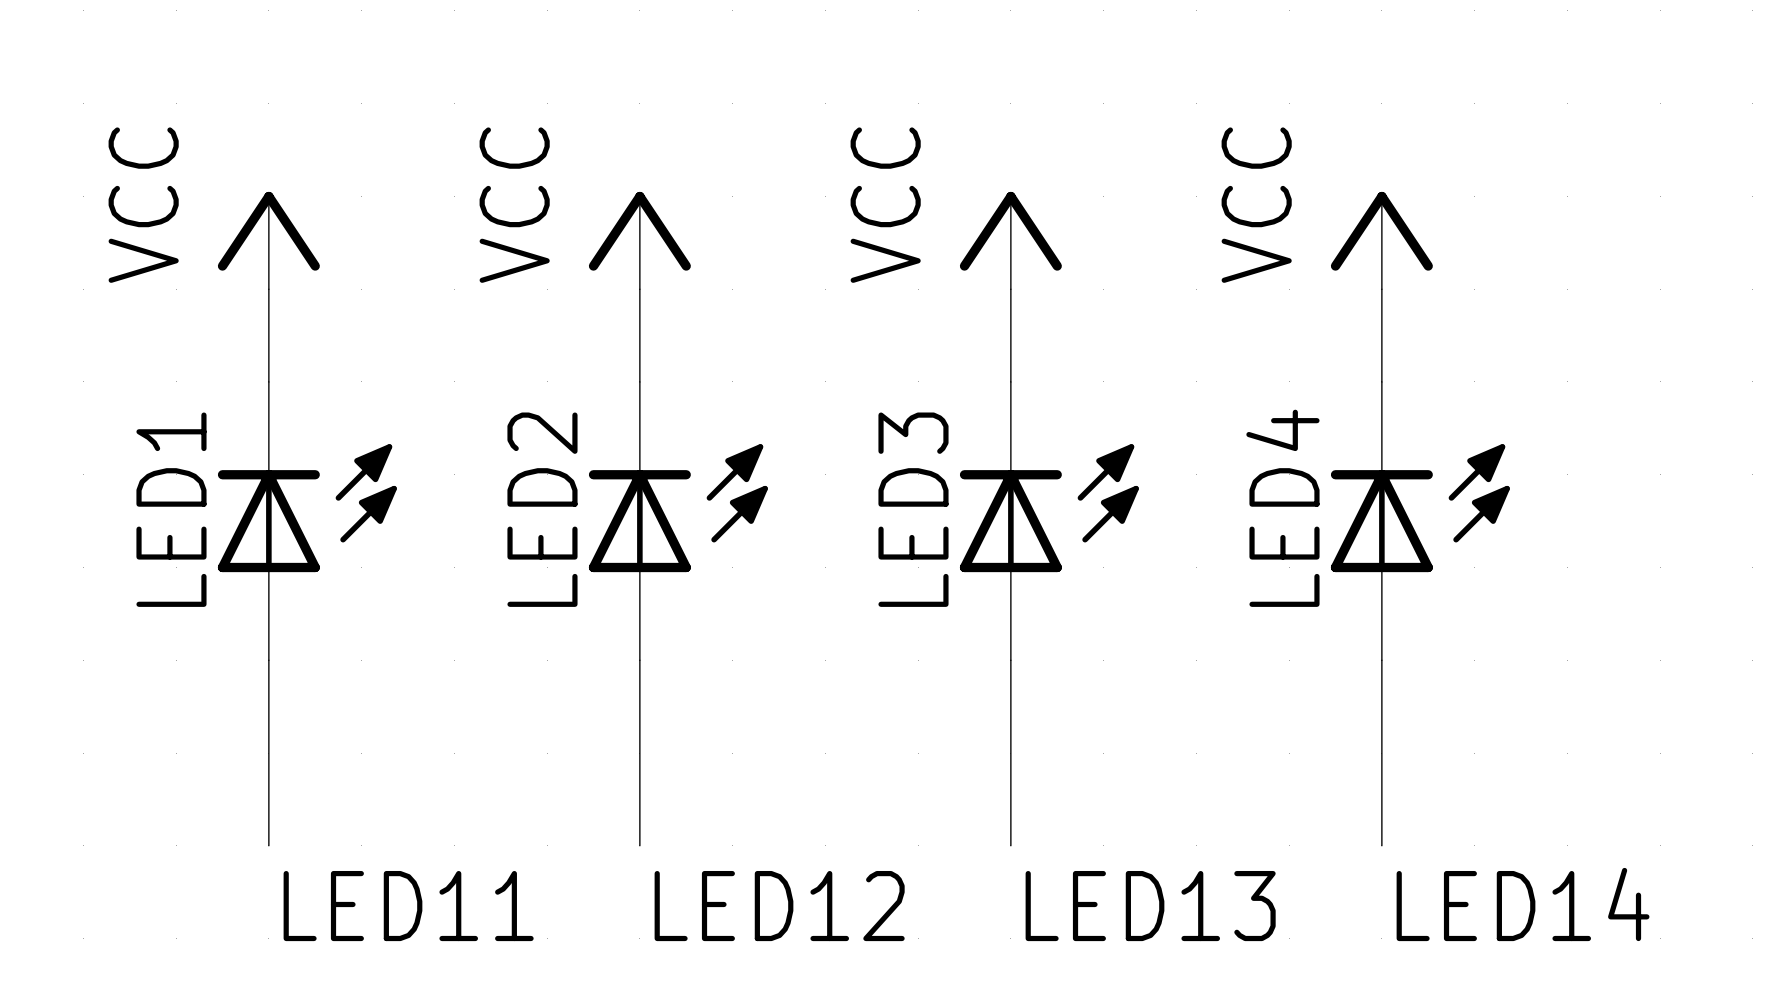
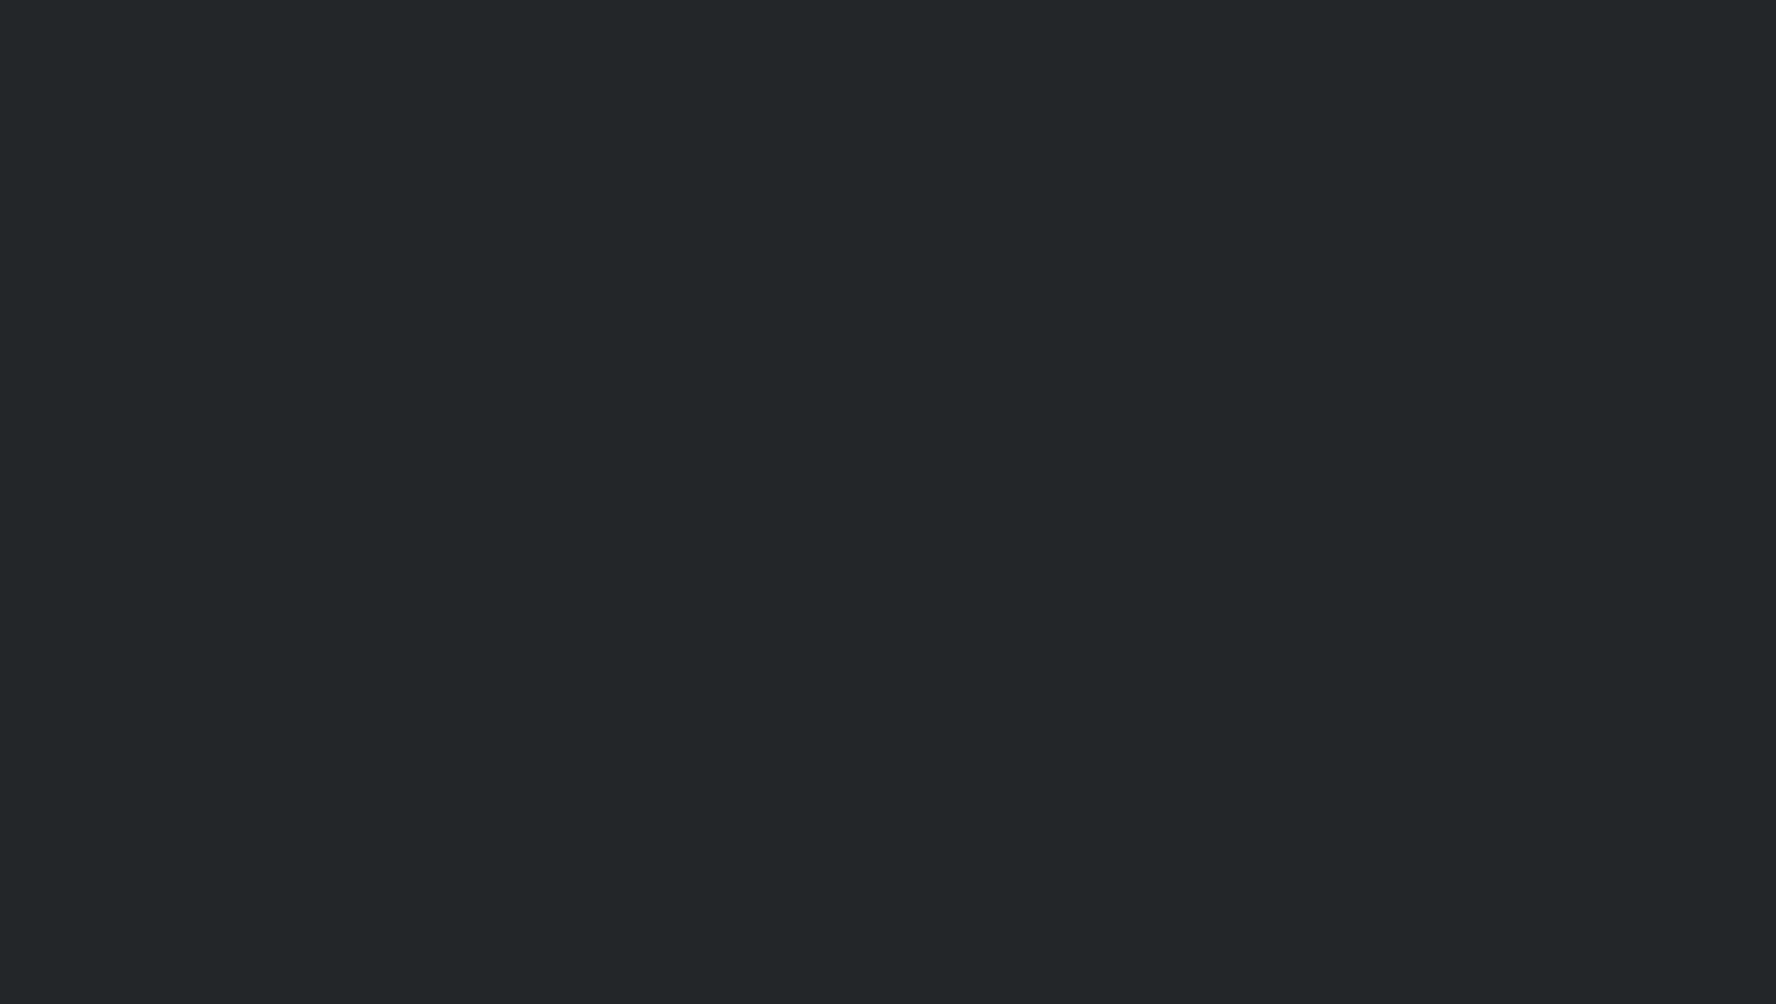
power symbol: VCC (268, 240) -> none
power symbol: VCC (639, 240) -> none
power symbol: VCC (1010, 240) -> none
power symbol: VCC (1381, 240) -> none
wire: (268, 289) (268, 381) -> none
wire: (639, 289) (639, 381) -> none
wire: (1010, 289) (1010, 381) -> none
wire: (1381, 289) (1381, 381) -> none
LED1: (307, 521) -> none
LED2: (678, 521) -> none
LED3: (1049, 521) -> none
LED4: (1420, 521) -> none
wire: (268, 660) (268, 845) -> none
wire: (639, 660) (639, 845) -> none
wire: (1010, 660) (1010, 845) -> none
wire: (1381, 660) (1381, 845) -> none
label: LED14 (1523, 904) -> none
label: LED11 (408, 906) -> none
label: LED12 (779, 906) -> none
label: LED13 (1150, 906) -> none

